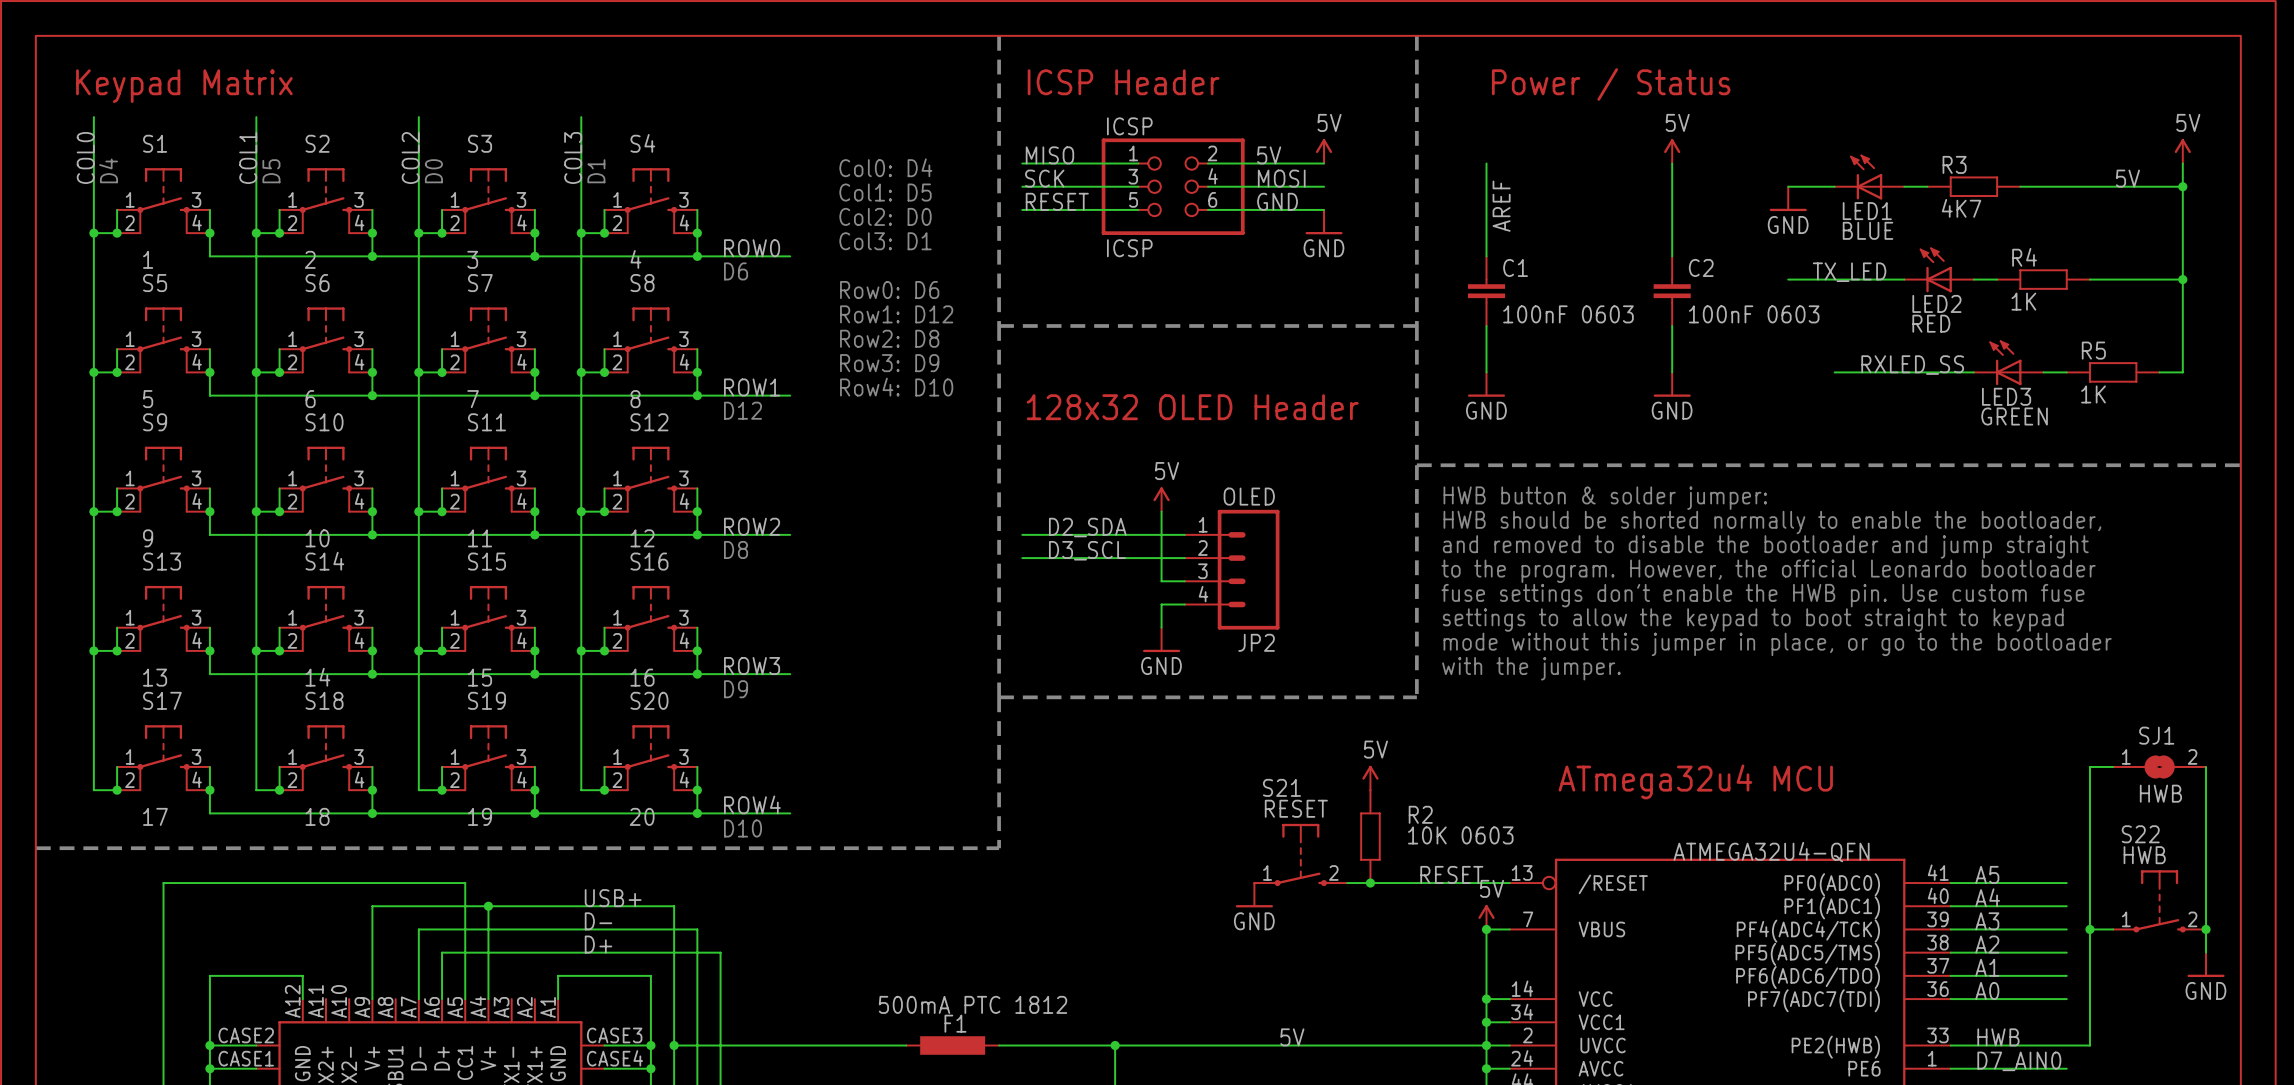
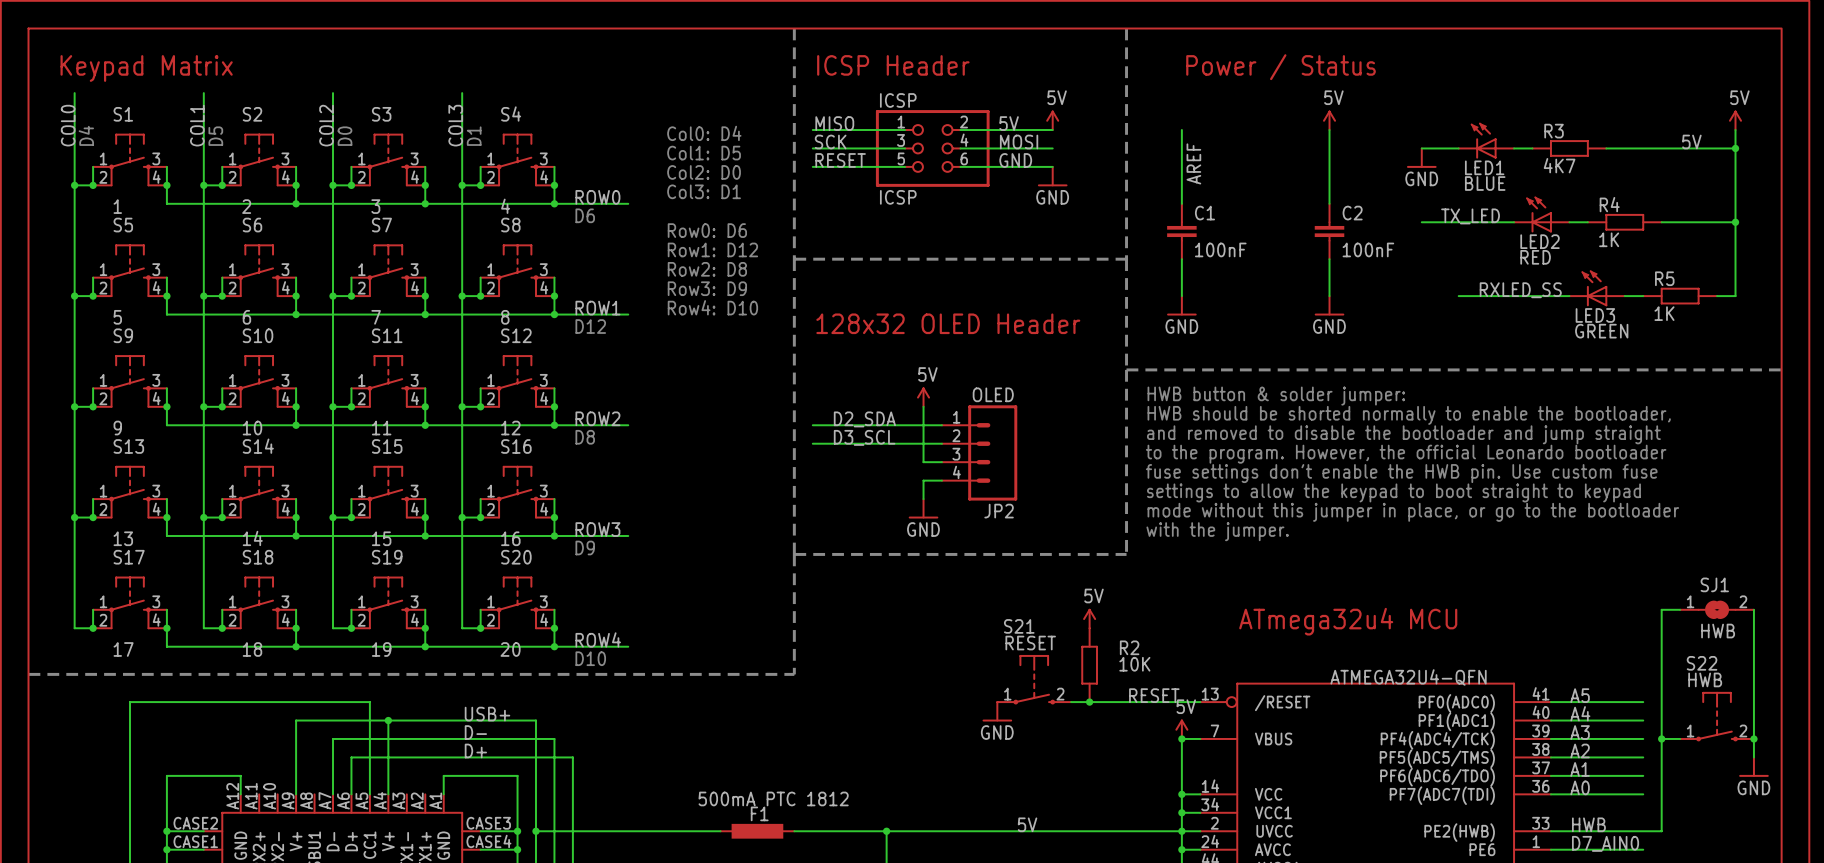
C1 value: 100nF 0603 (1568, 314) -> 100nF (1220, 249)
C2 value: 100nF 0603 (1754, 314) -> 100nF (1368, 249)
R2 value: 10K 0603 (1460, 835) -> 10K (1134, 664)

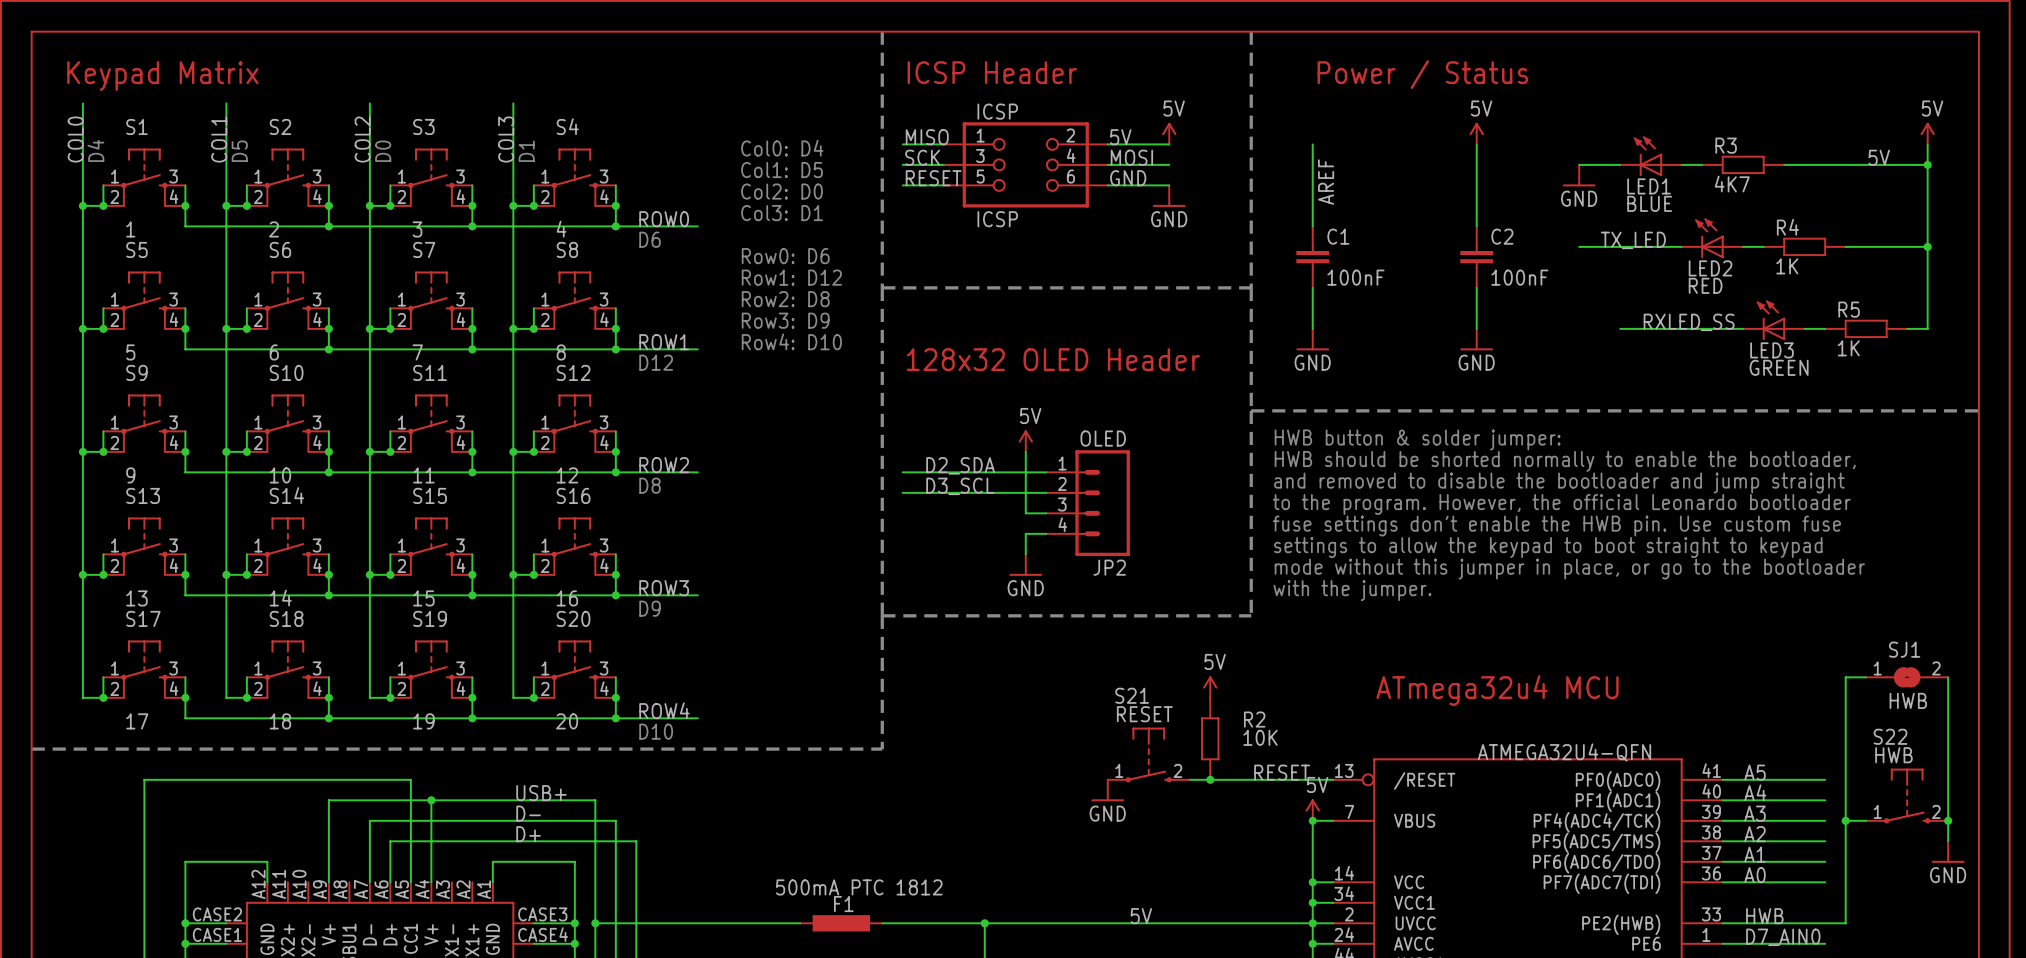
ICSP: none -> ICSP (1025, 164)
ICSP: ICSP (932, 148) -> none

